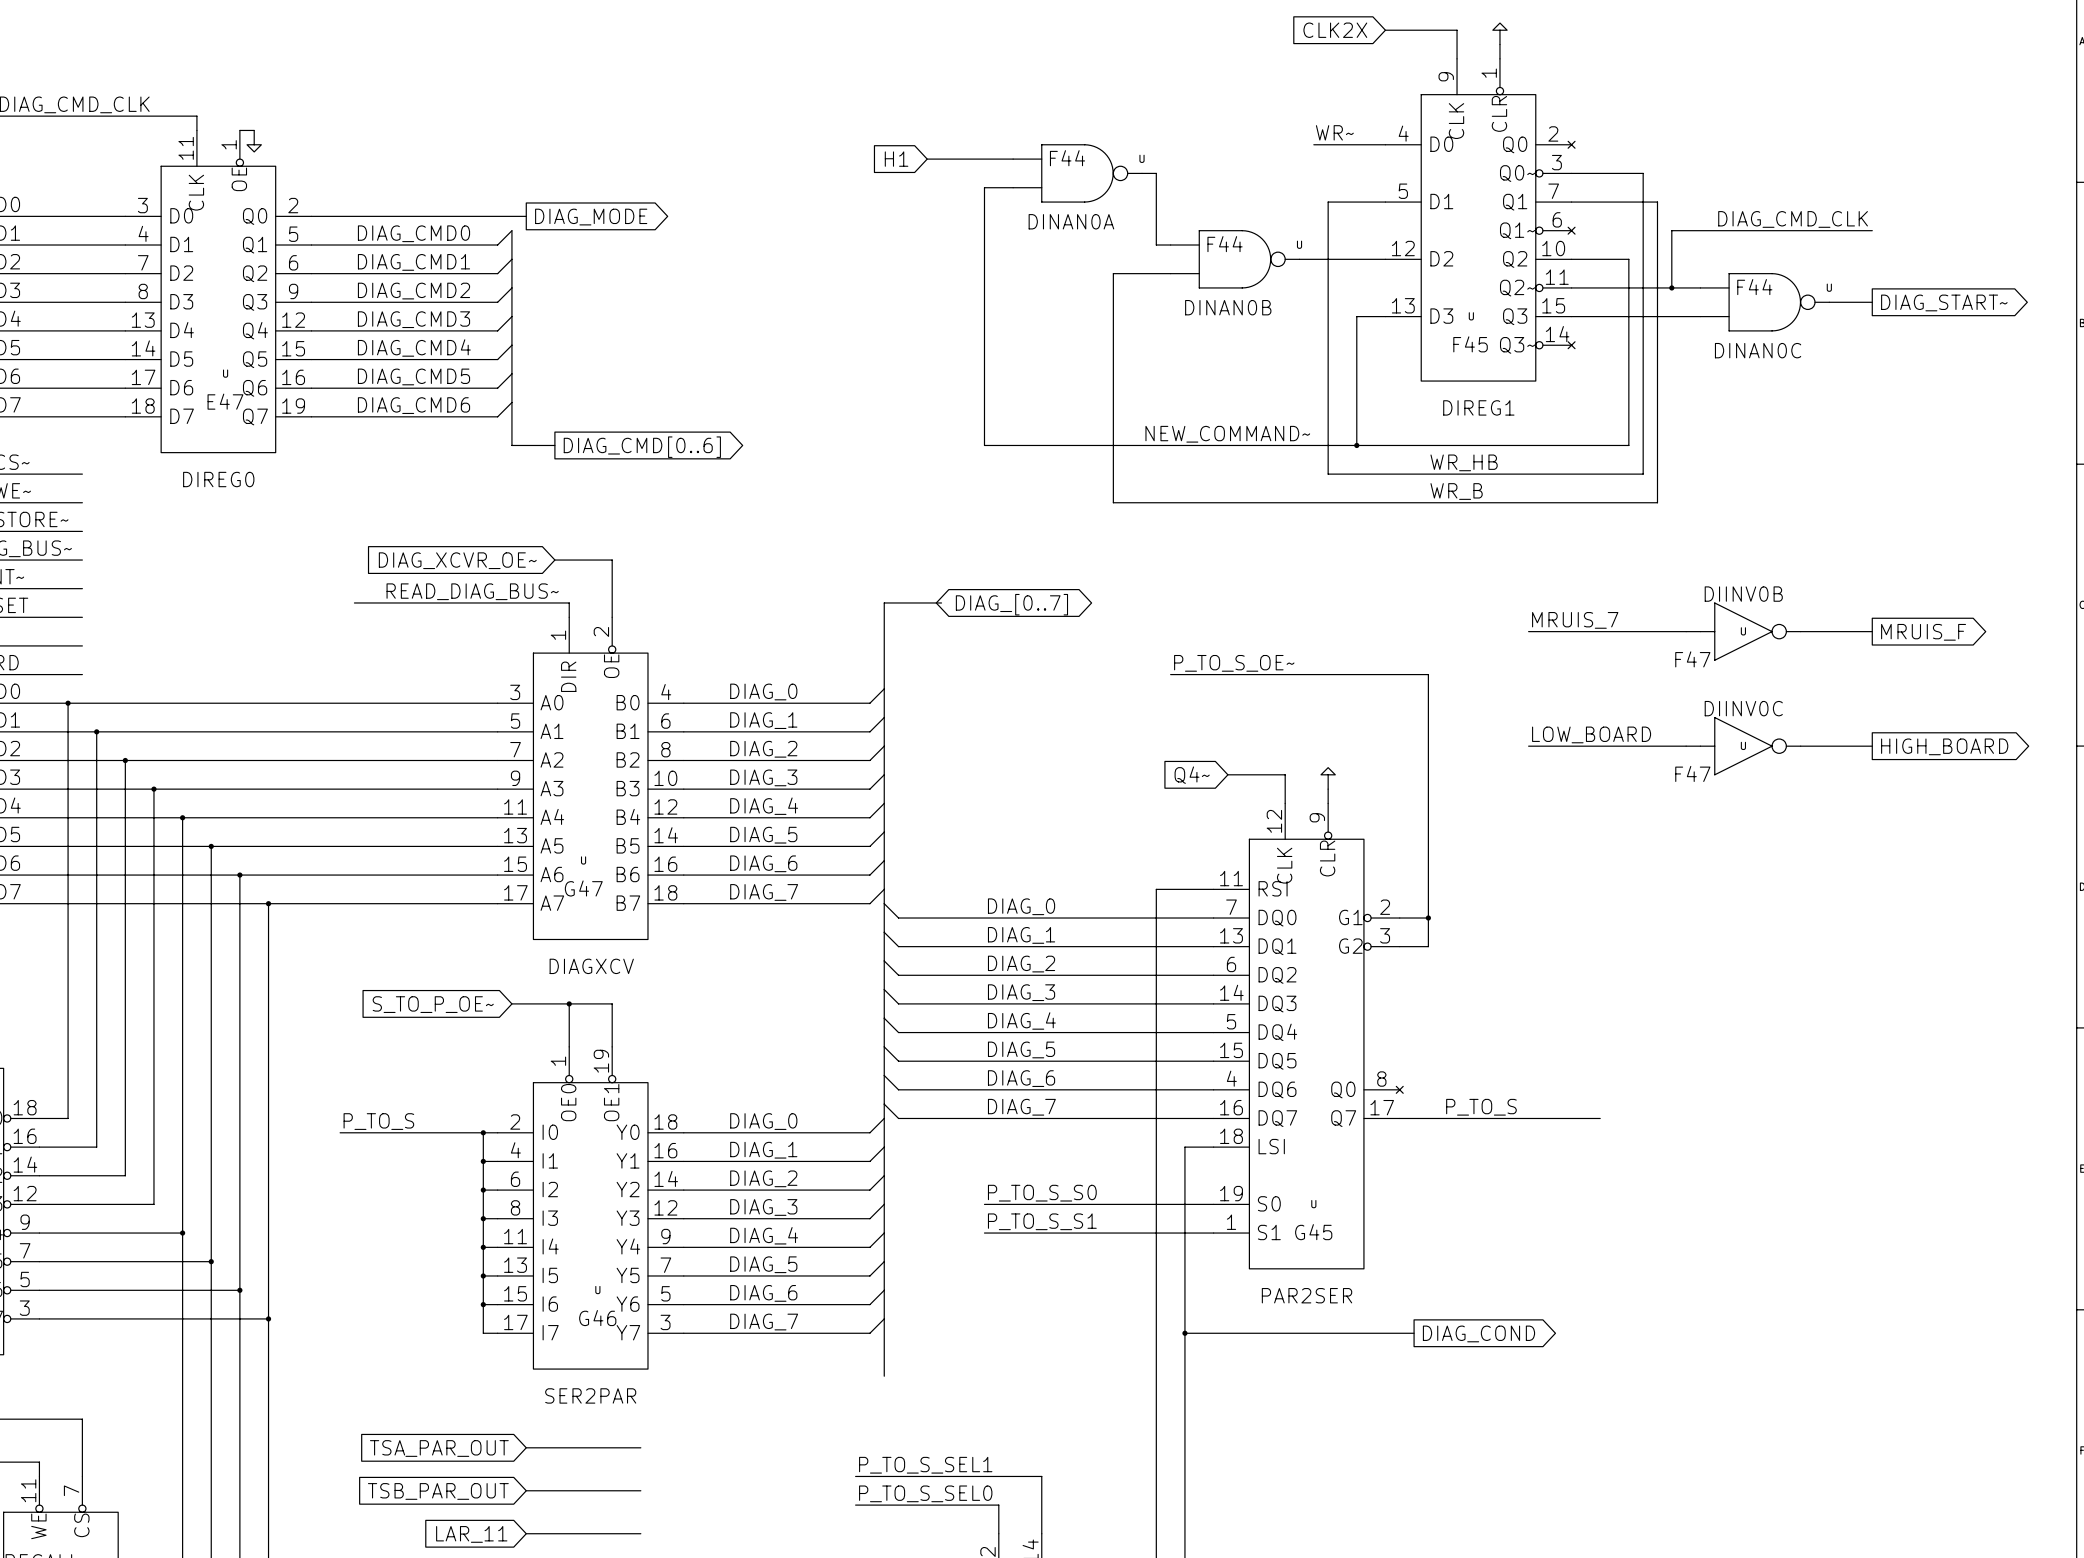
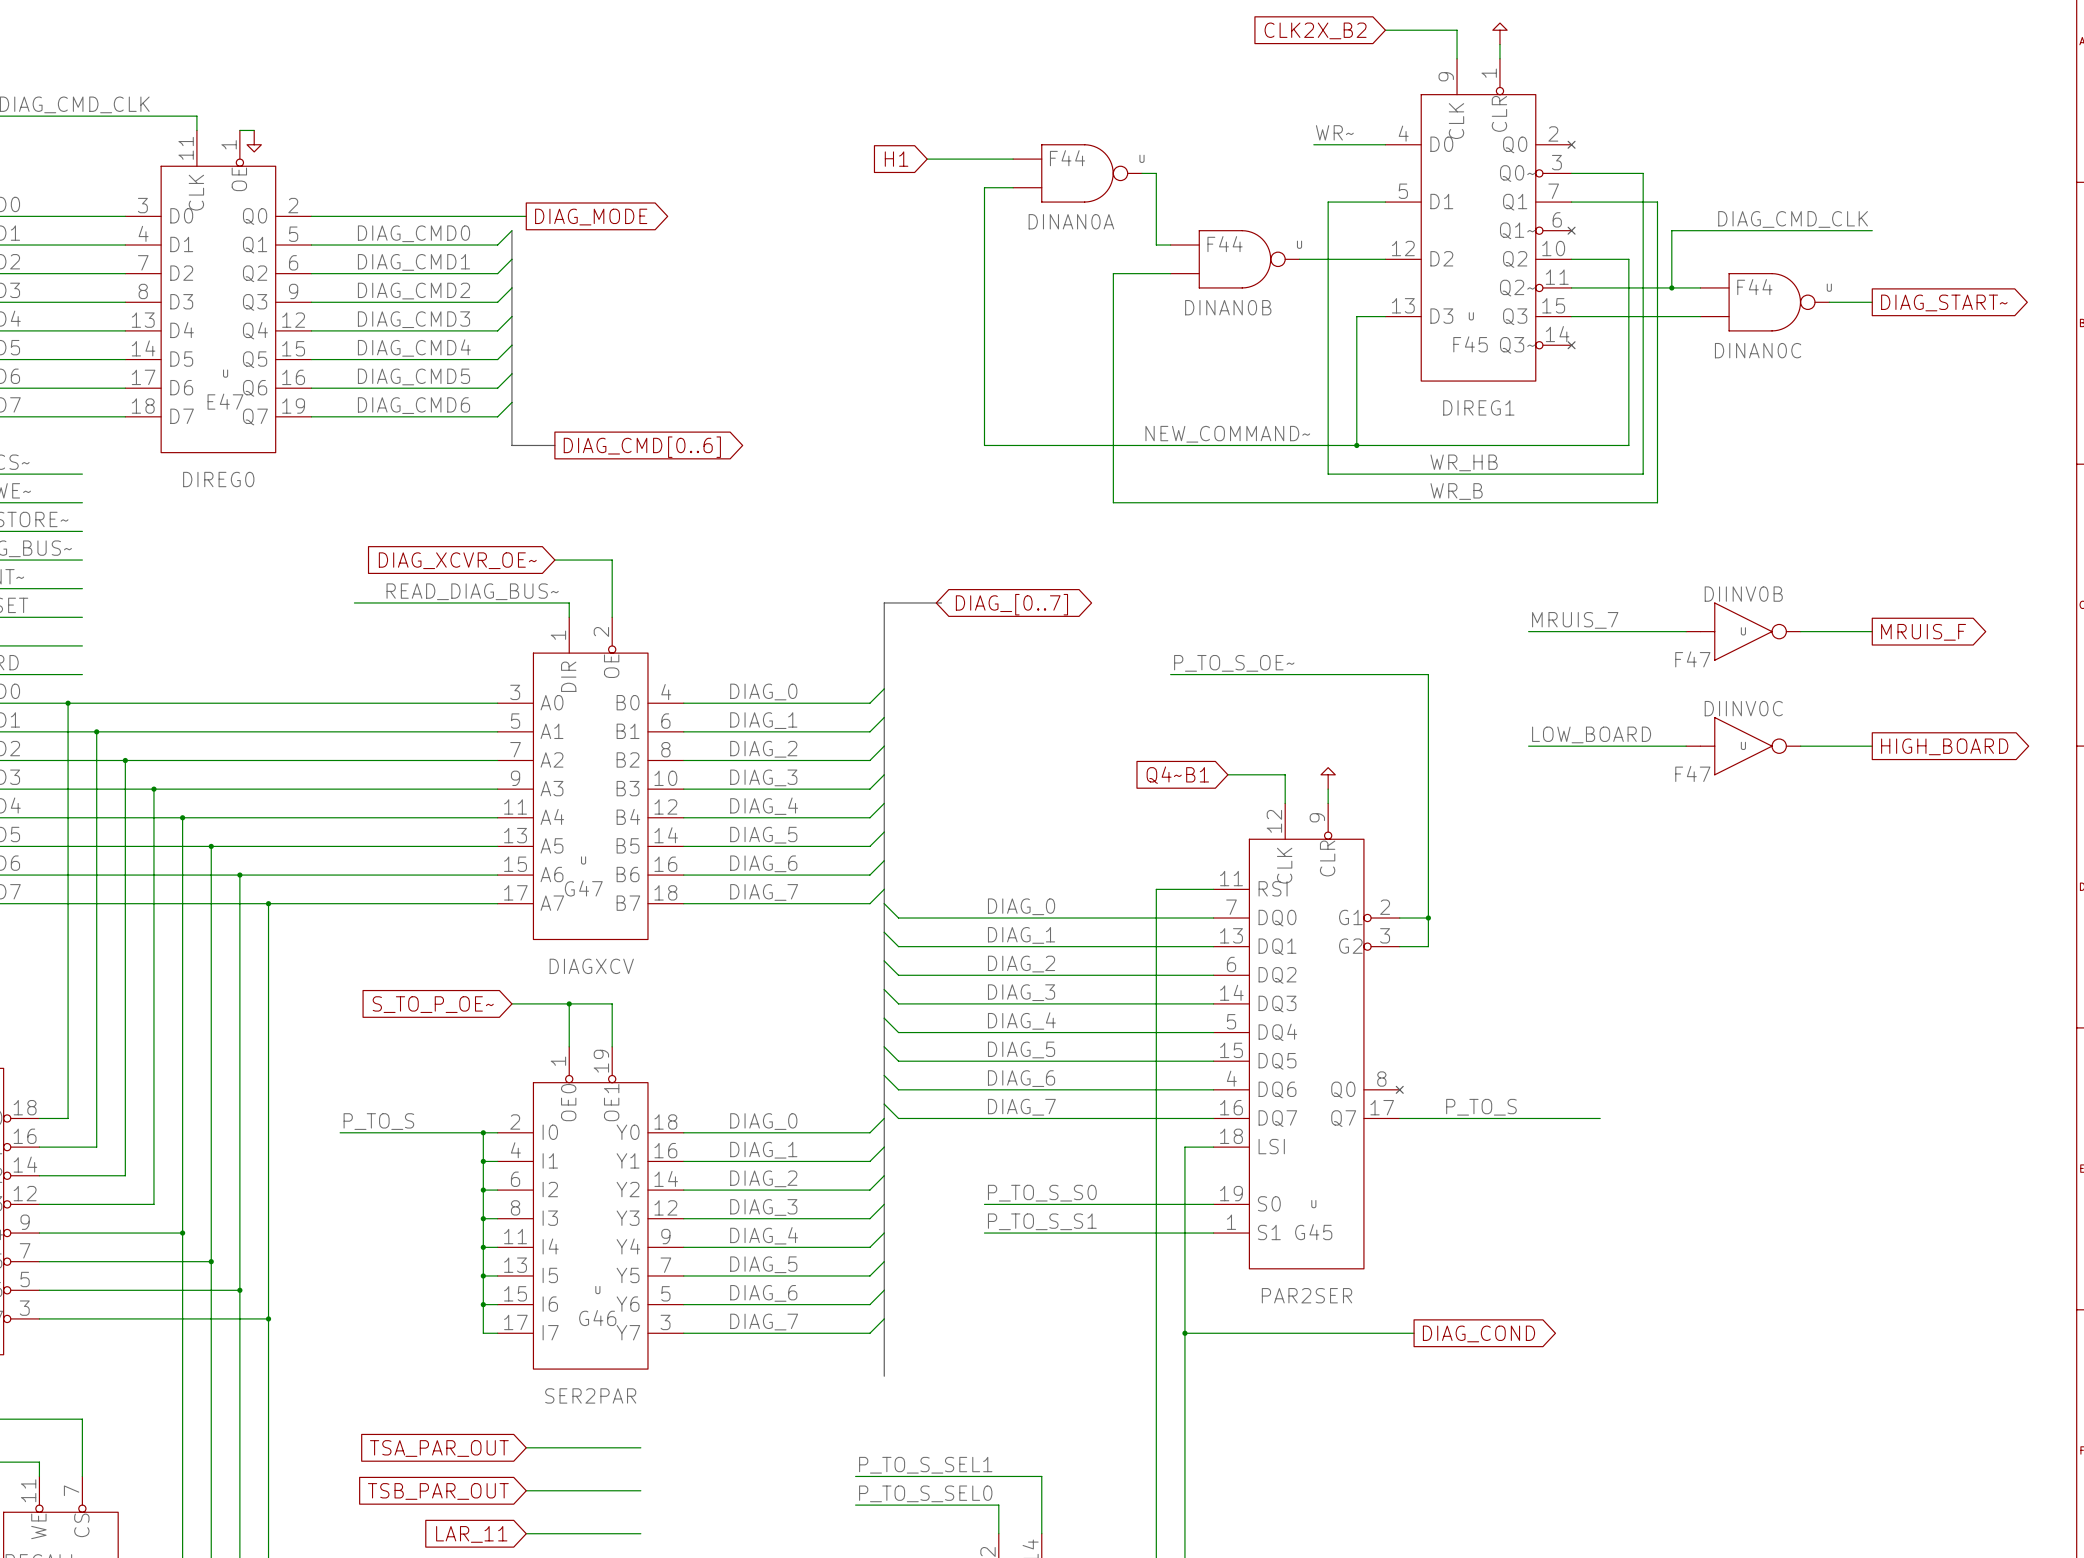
global label: CLK2X (1335, 30) -> CLK2X_B2 (1315, 30)
global label: Q4~ (1192, 775) -> Q4~B1 (1177, 775)

